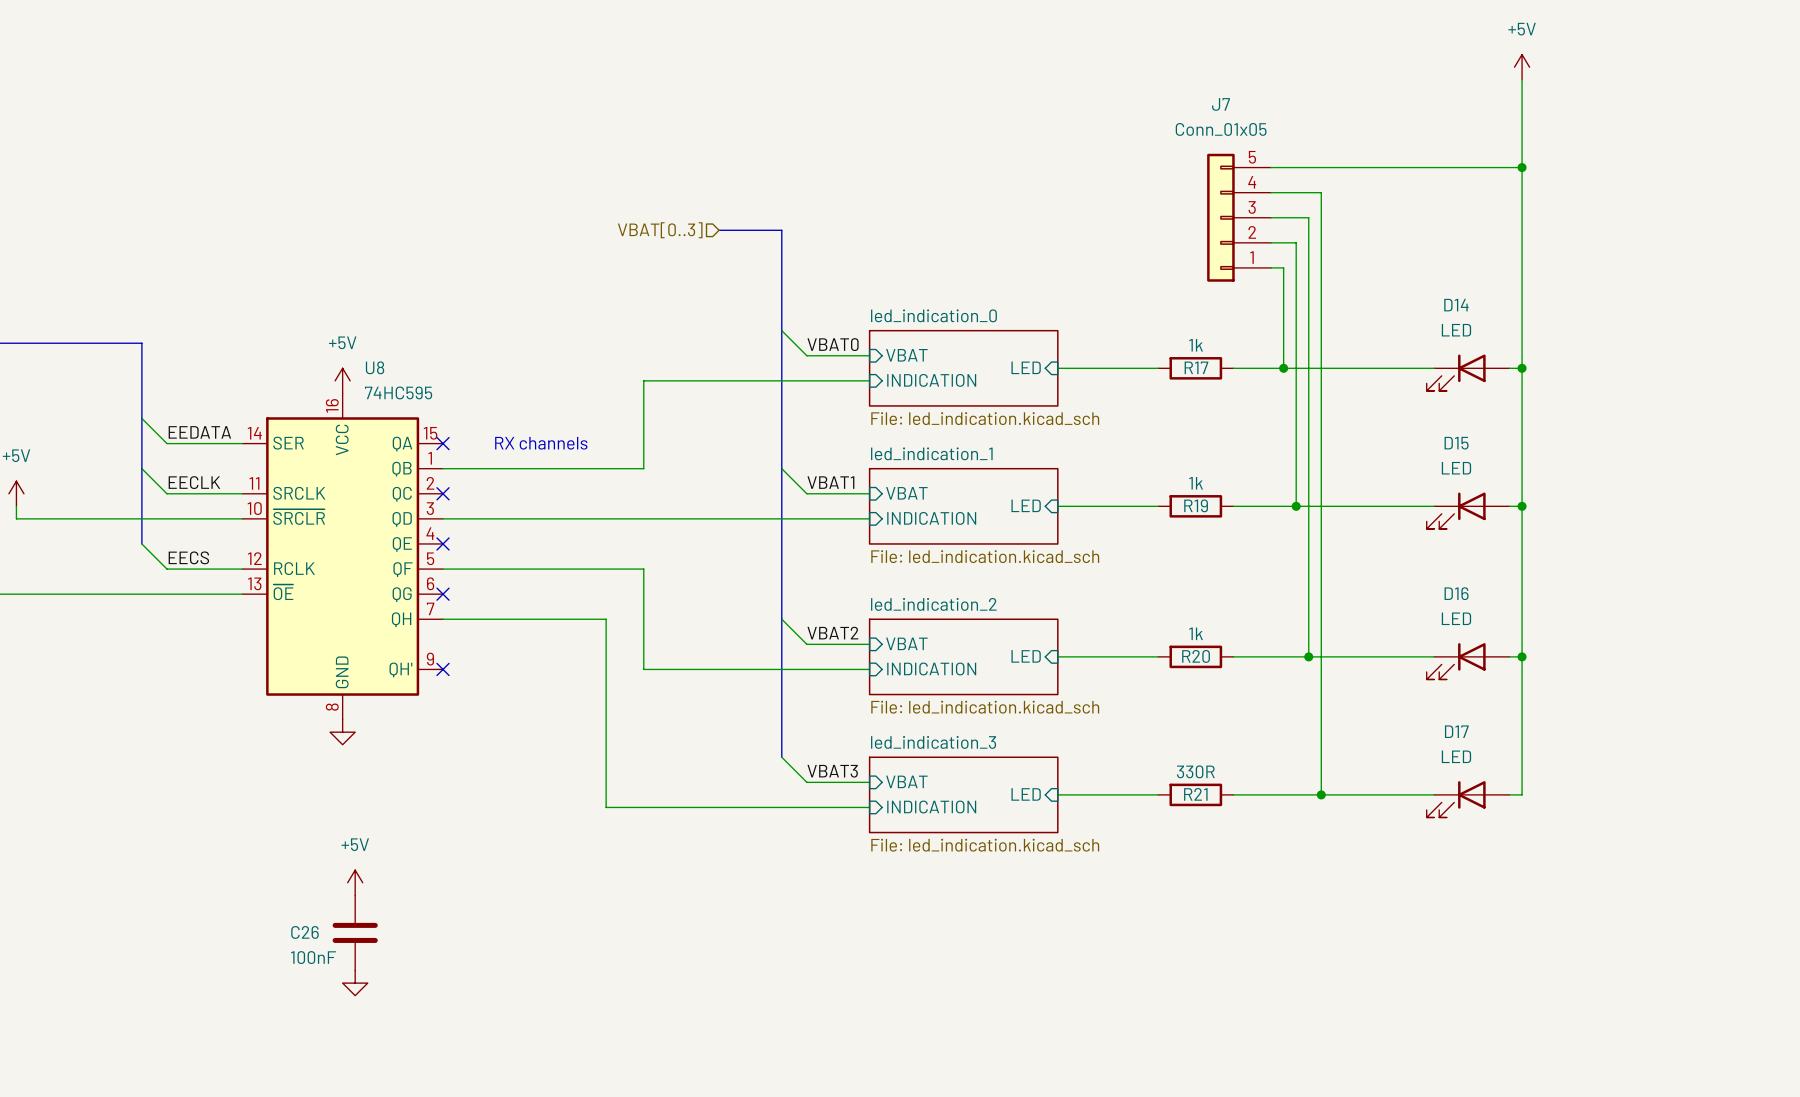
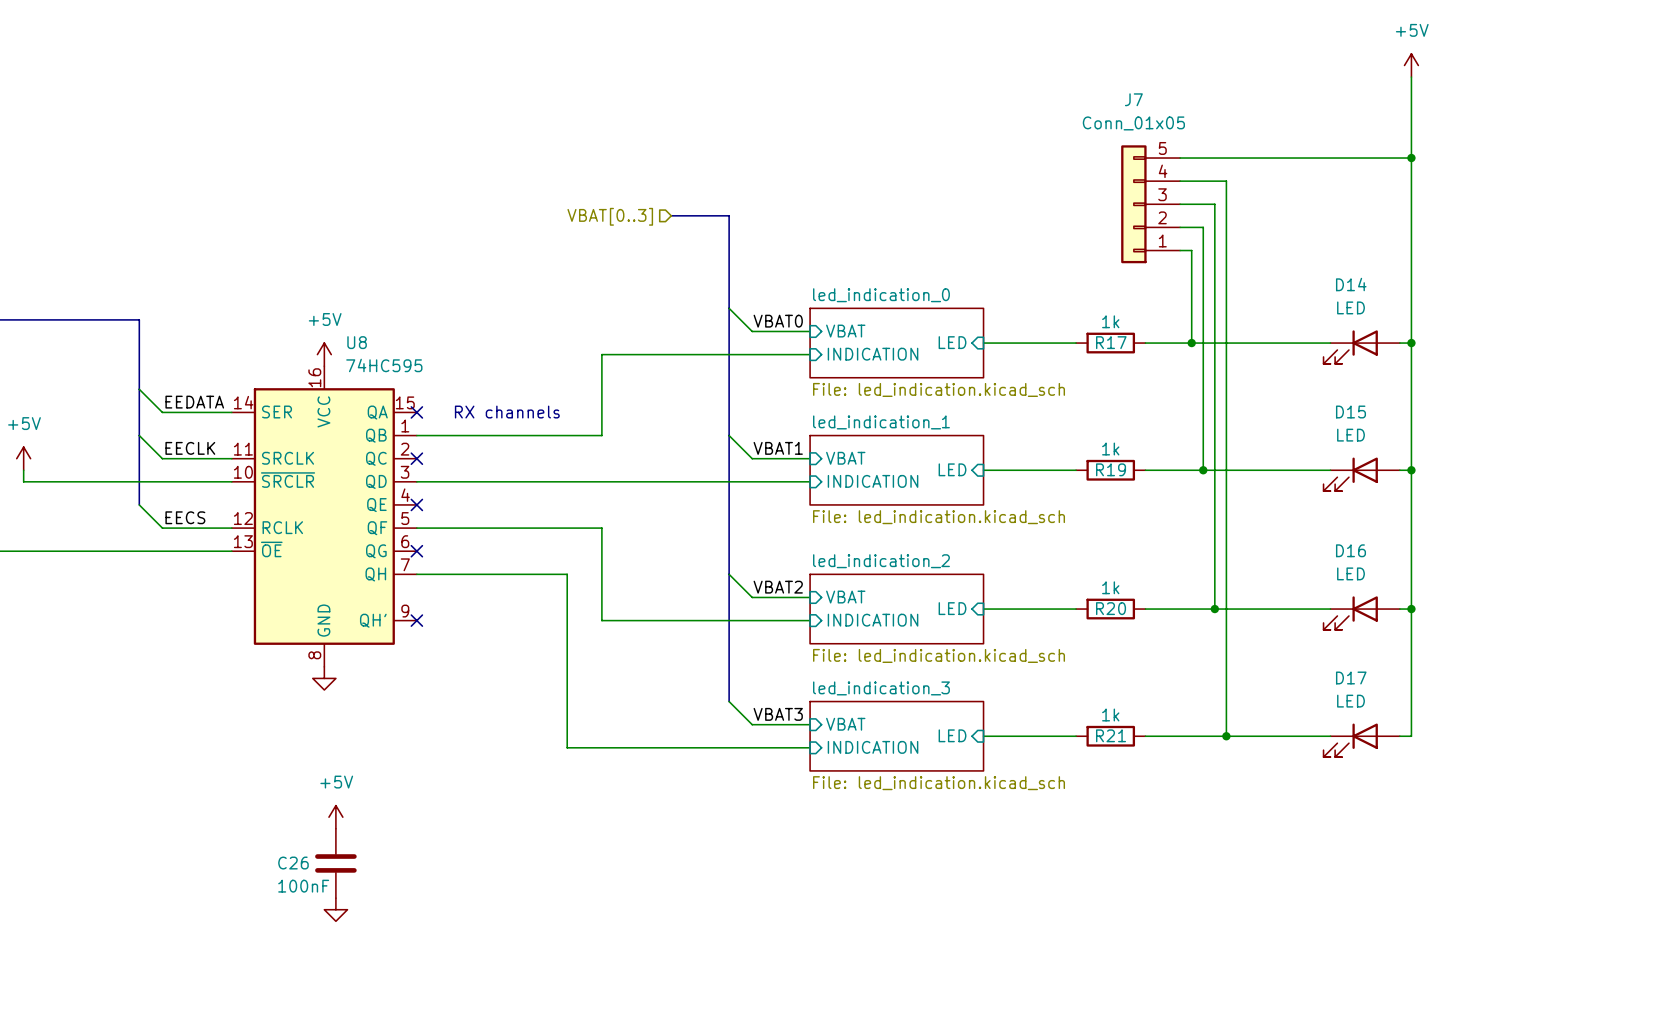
R21 value: 330R (1195, 771) -> 1k (1110, 715)

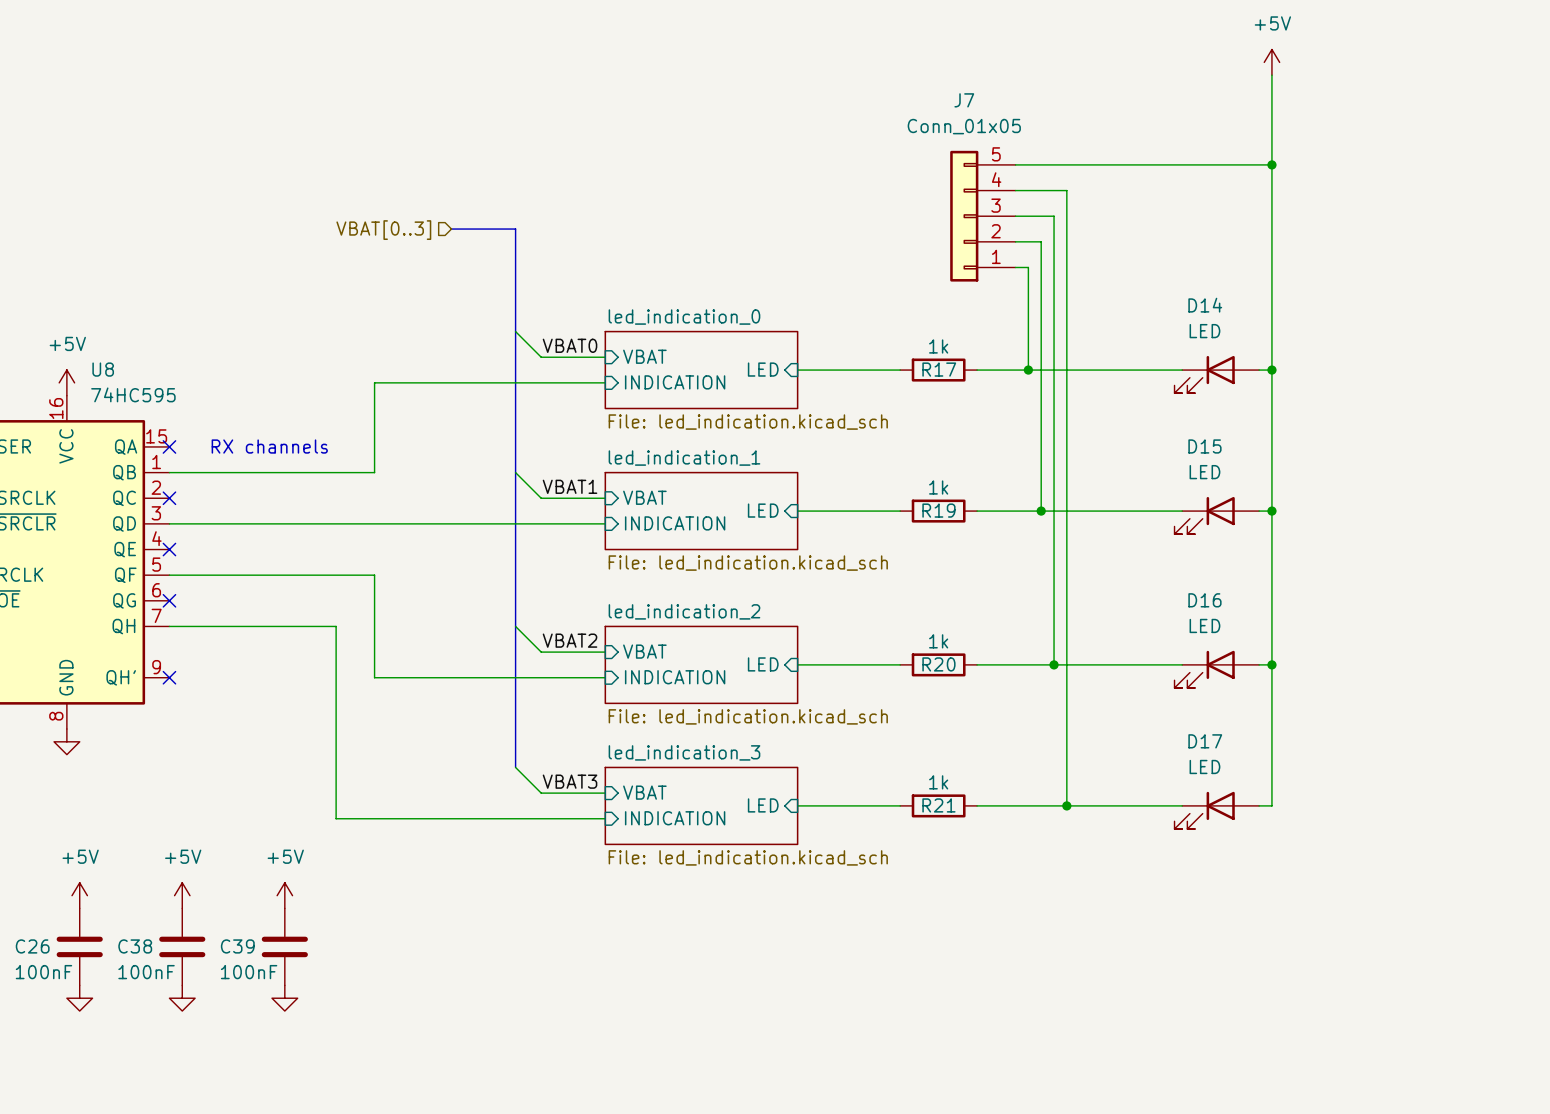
power symbol: none -> +5V (182, 895)
power symbol: none -> +5V (284, 895)
C38: none -> 100nF (182, 946)
C39: none -> 100nF (284, 946)
power symbol: none -> (182, 998)
power symbol: none -> (284, 998)

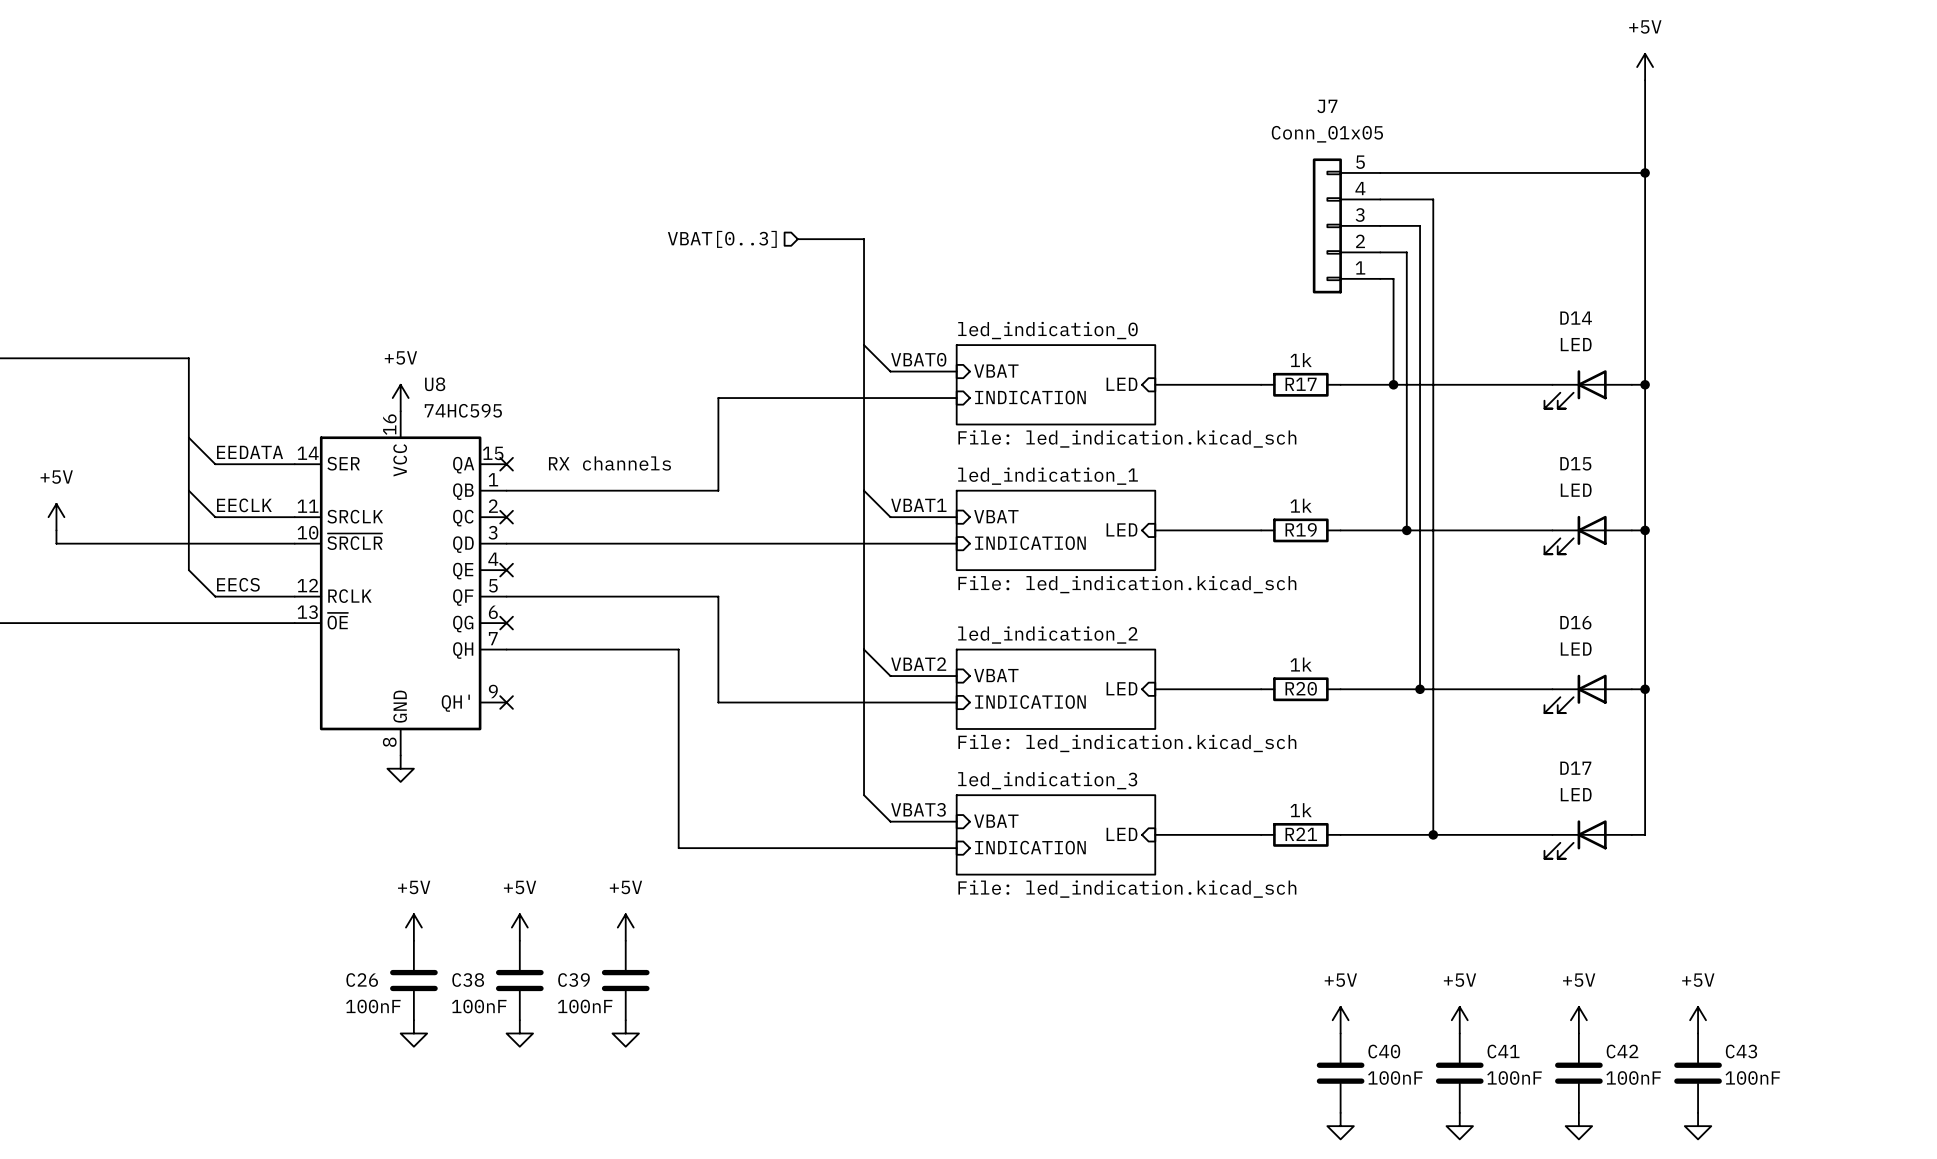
power symbol: none -> +5V (1340, 1020)
power symbol: none -> +5V (1459, 1020)
power symbol: none -> +5V (1578, 1020)
power symbol: none -> +5V (1698, 1020)
C40: none -> 100nF (1340, 1073)
C41: none -> 100nF (1459, 1073)
C42: none -> 100nF (1578, 1073)
C43: none -> 100nF (1698, 1073)
power symbol: none -> (1340, 1126)
power symbol: none -> (1459, 1126)
power symbol: none -> (1578, 1126)
power symbol: none -> (1698, 1126)

